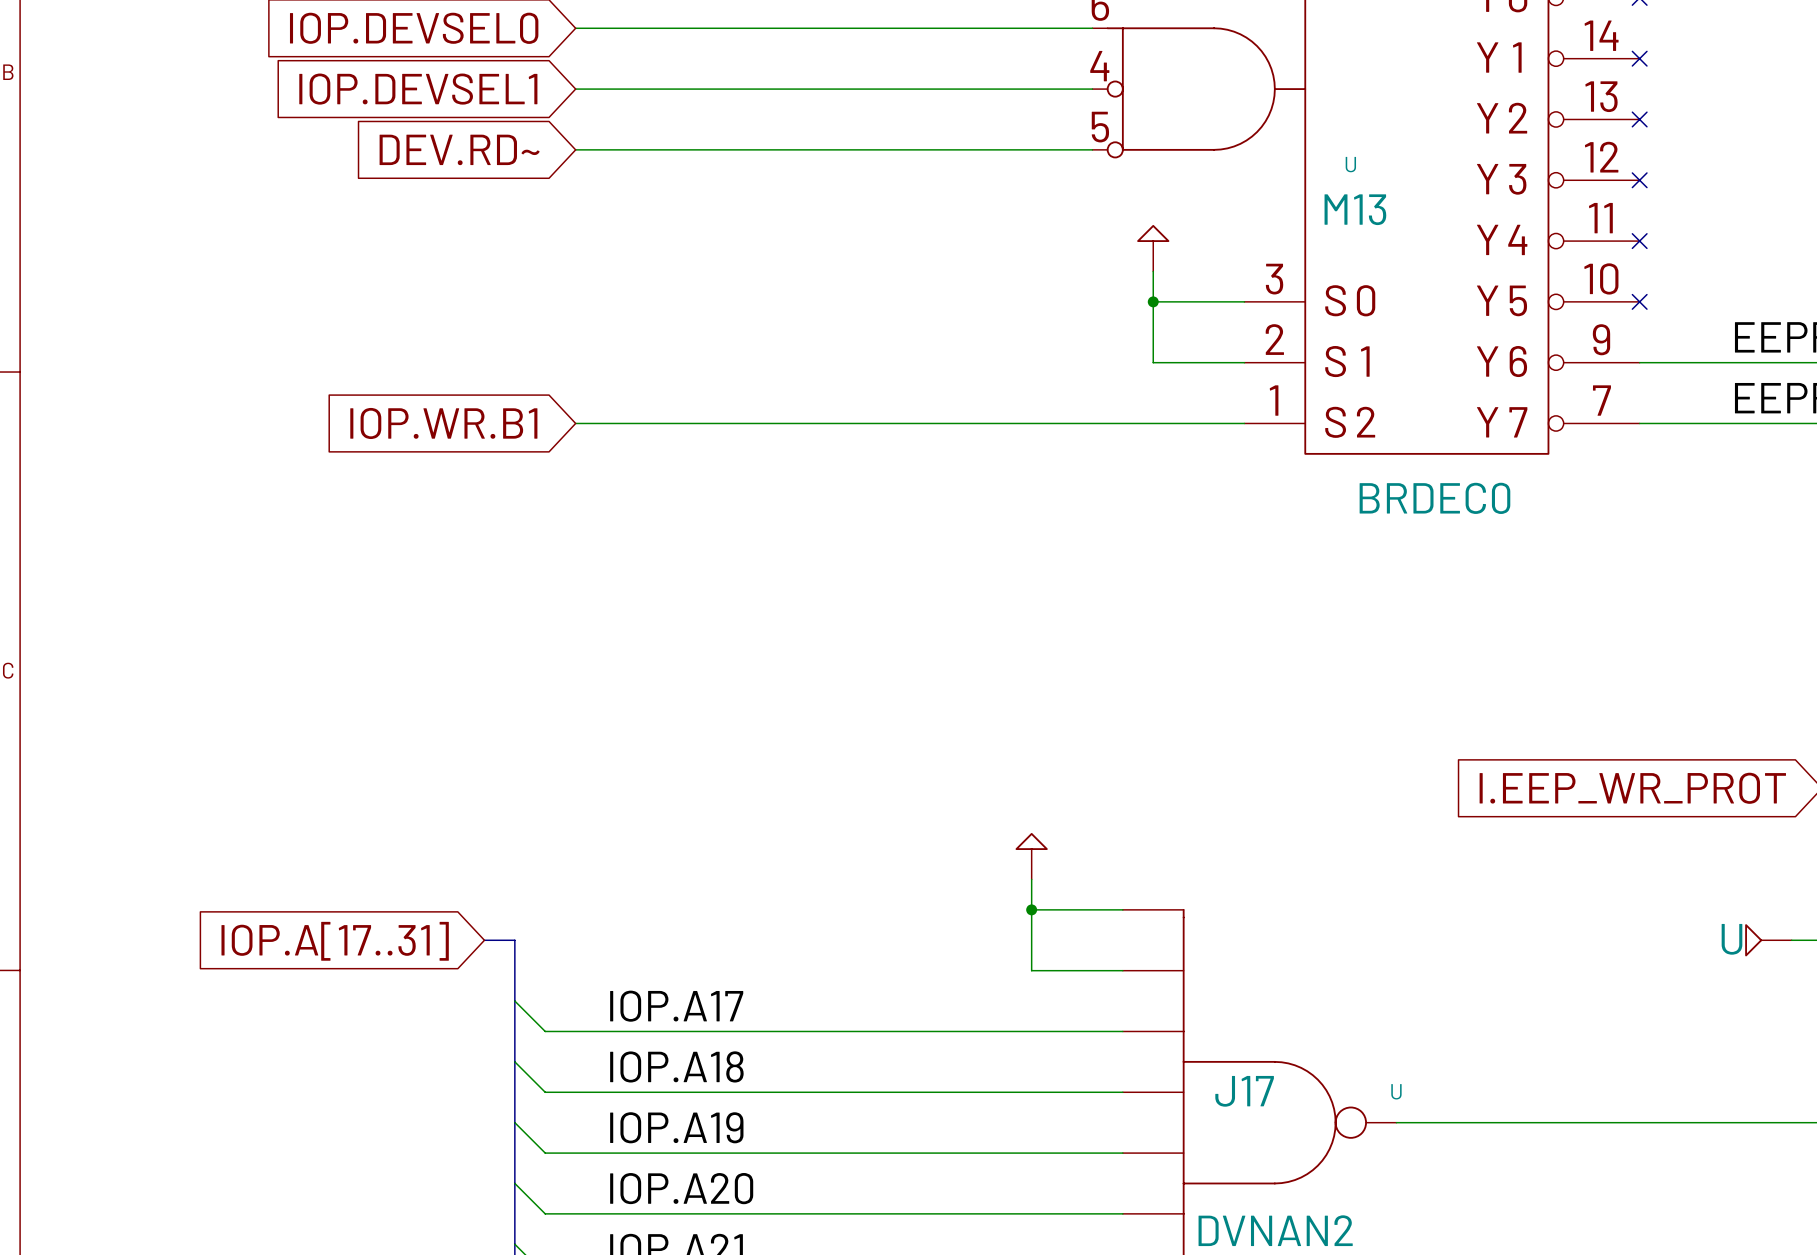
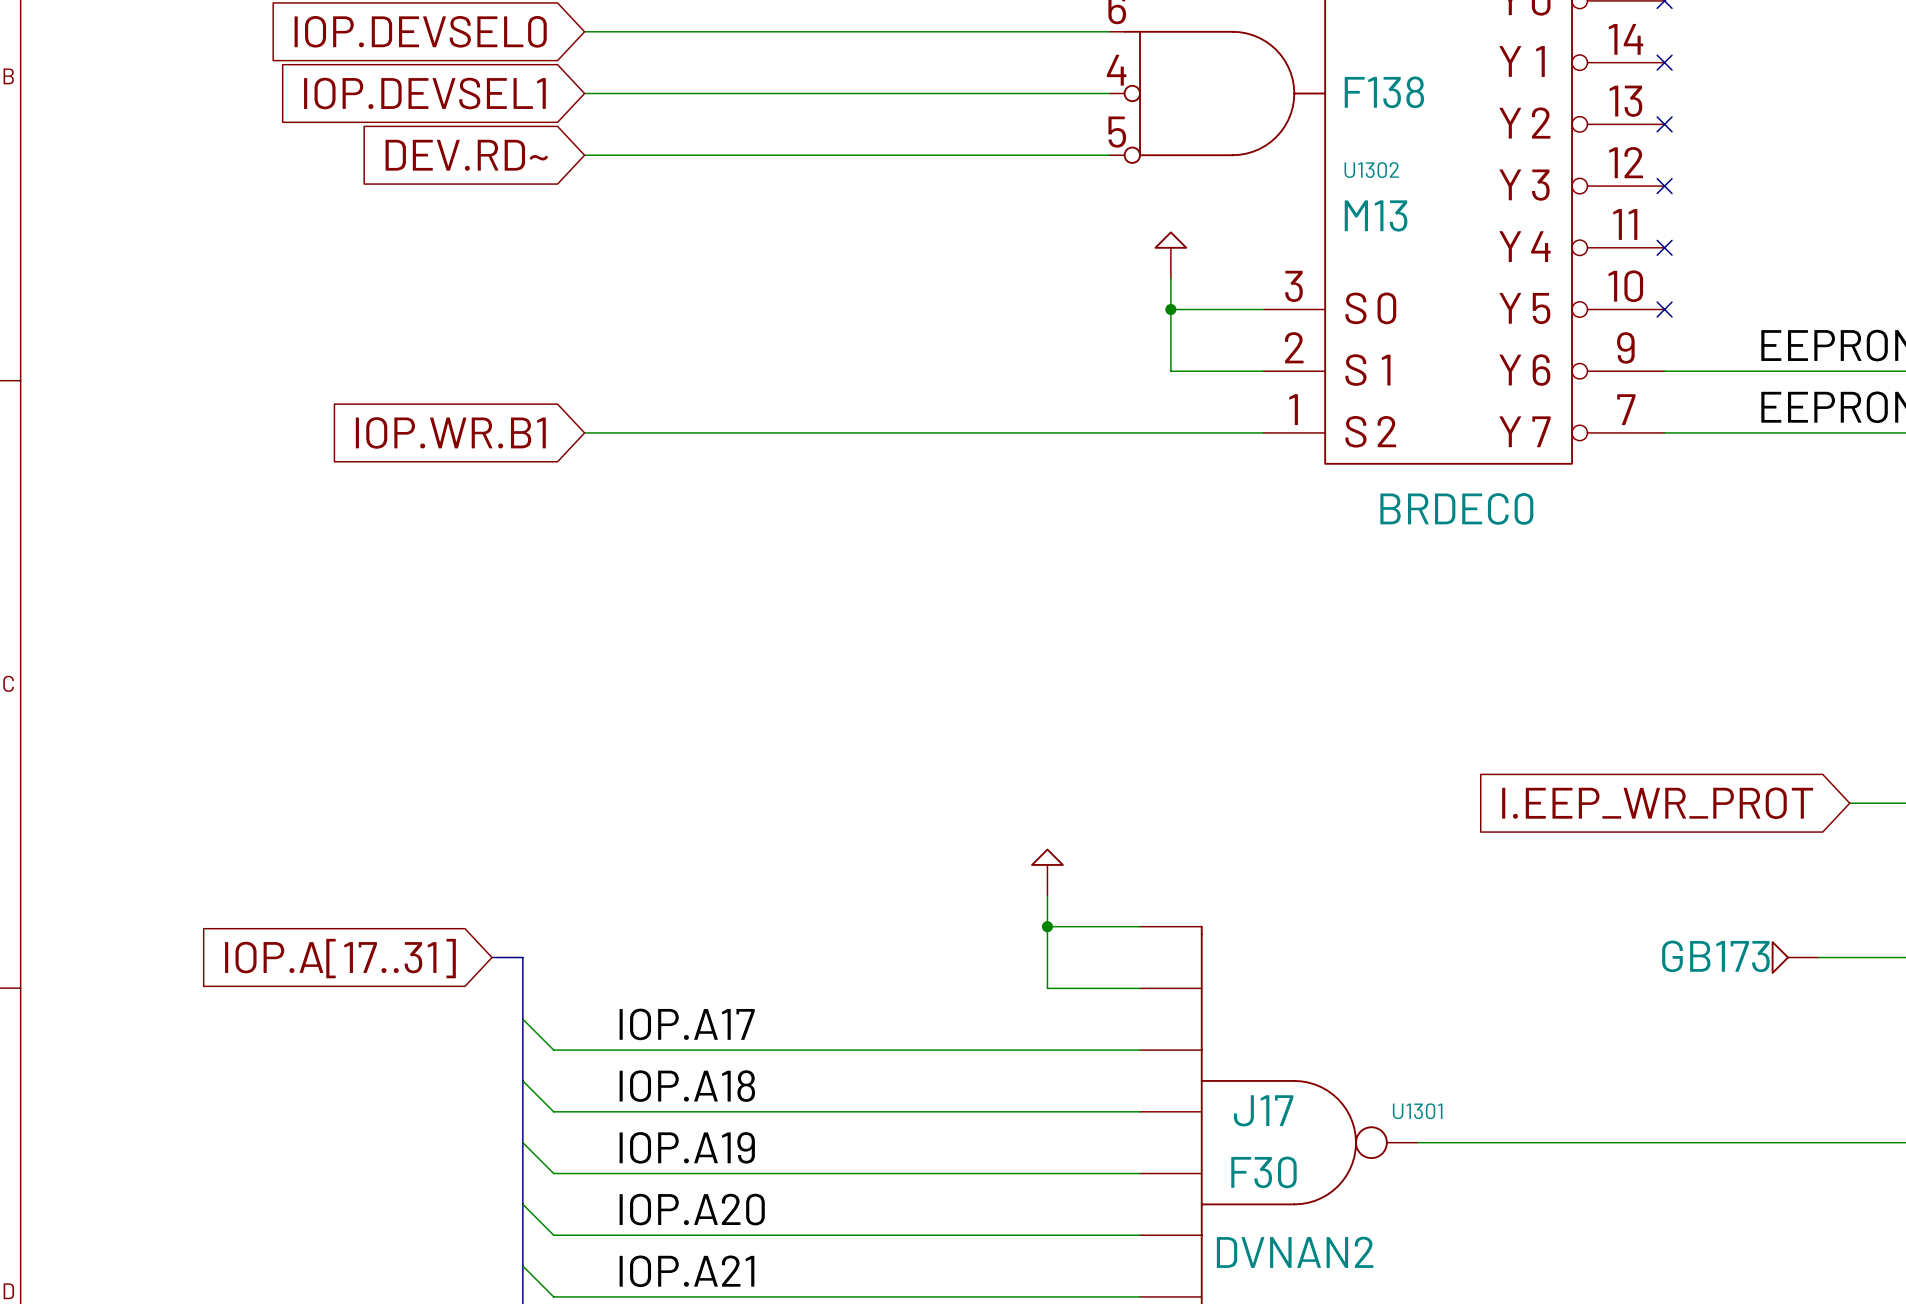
U value: none -> F138 (1384, 92)
U name: U (1350, 164) -> U1302 (1371, 170)
U name: U (1731, 939) -> GB173 (1715, 956)
U name: U (1396, 1091) -> U1301 (1417, 1111)
U value: none -> F30 (1263, 1172)

